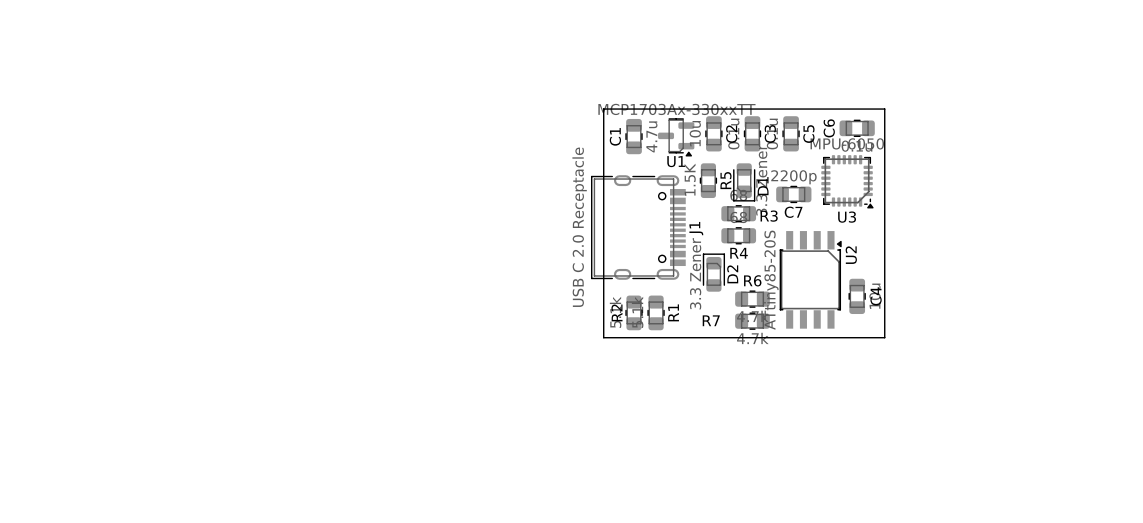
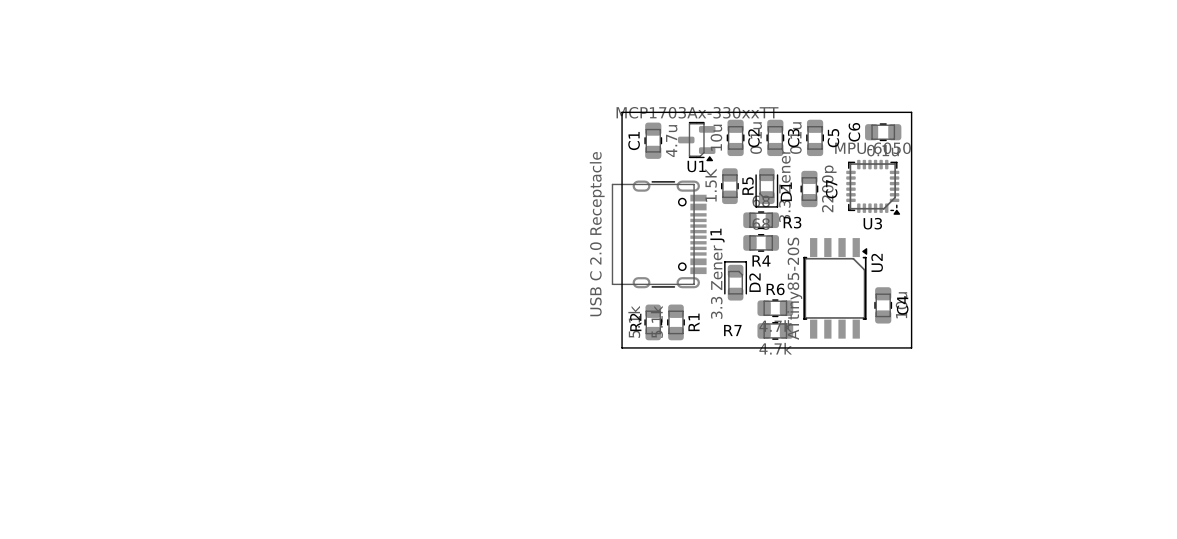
J1 footprint: [591, 175, 686, 280] -> [611, 180, 707, 289]
C7 rotation: 0° (793, 194) -> 90° clockwise (809, 188)
C7 name position: C7 (793, 212) -> C7 (831, 189)

